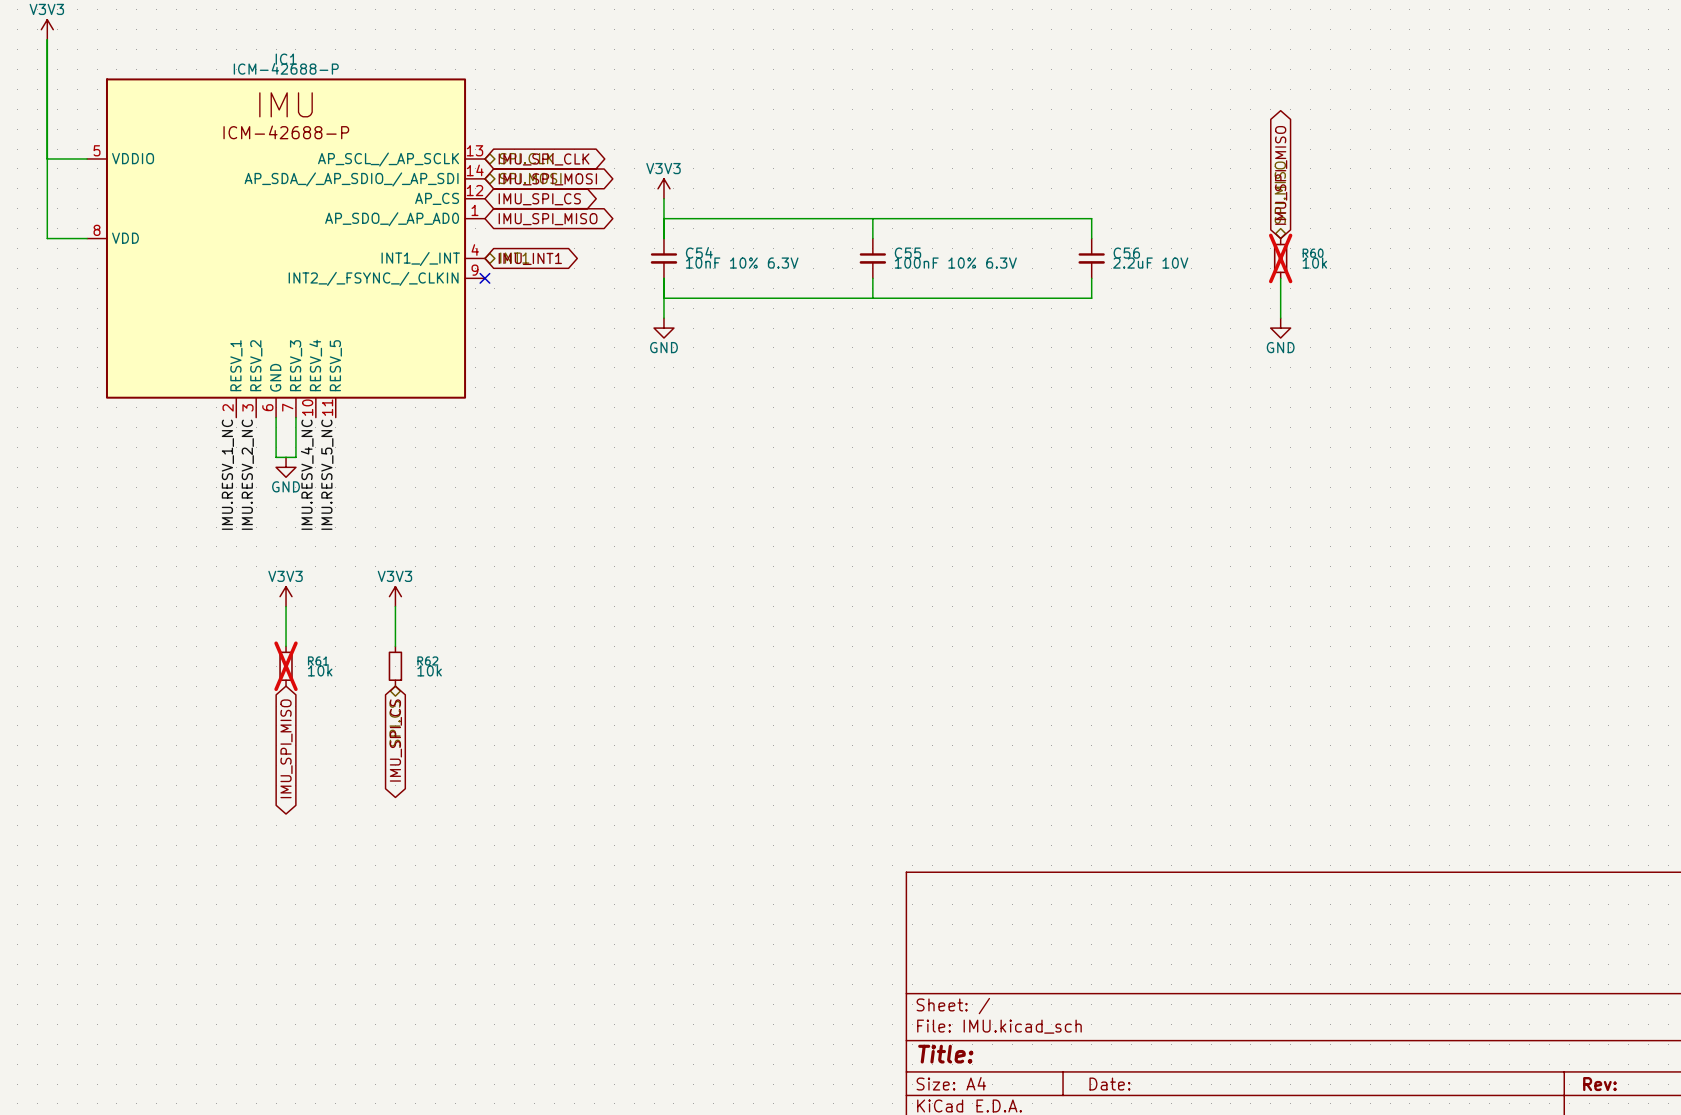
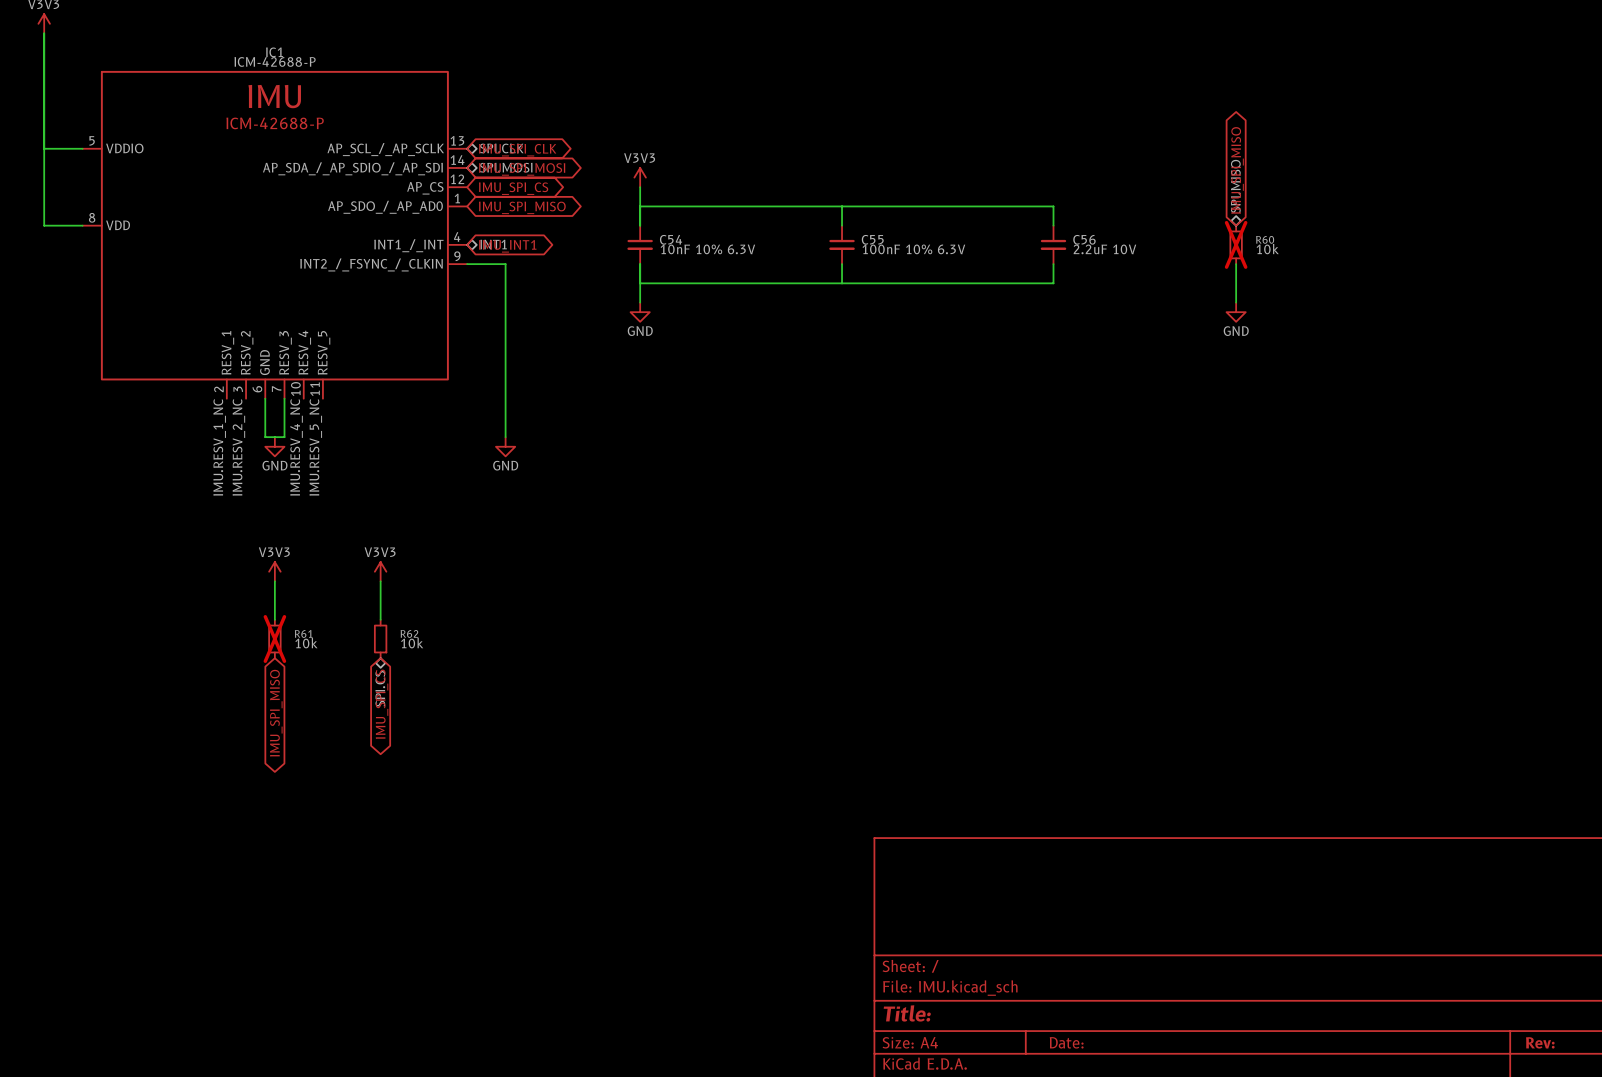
wire: none -> (467, 264) (505, 264) (505, 437)
no-connect mark: (484, 278) -> none
power symbol: none -> GND (505, 446)

